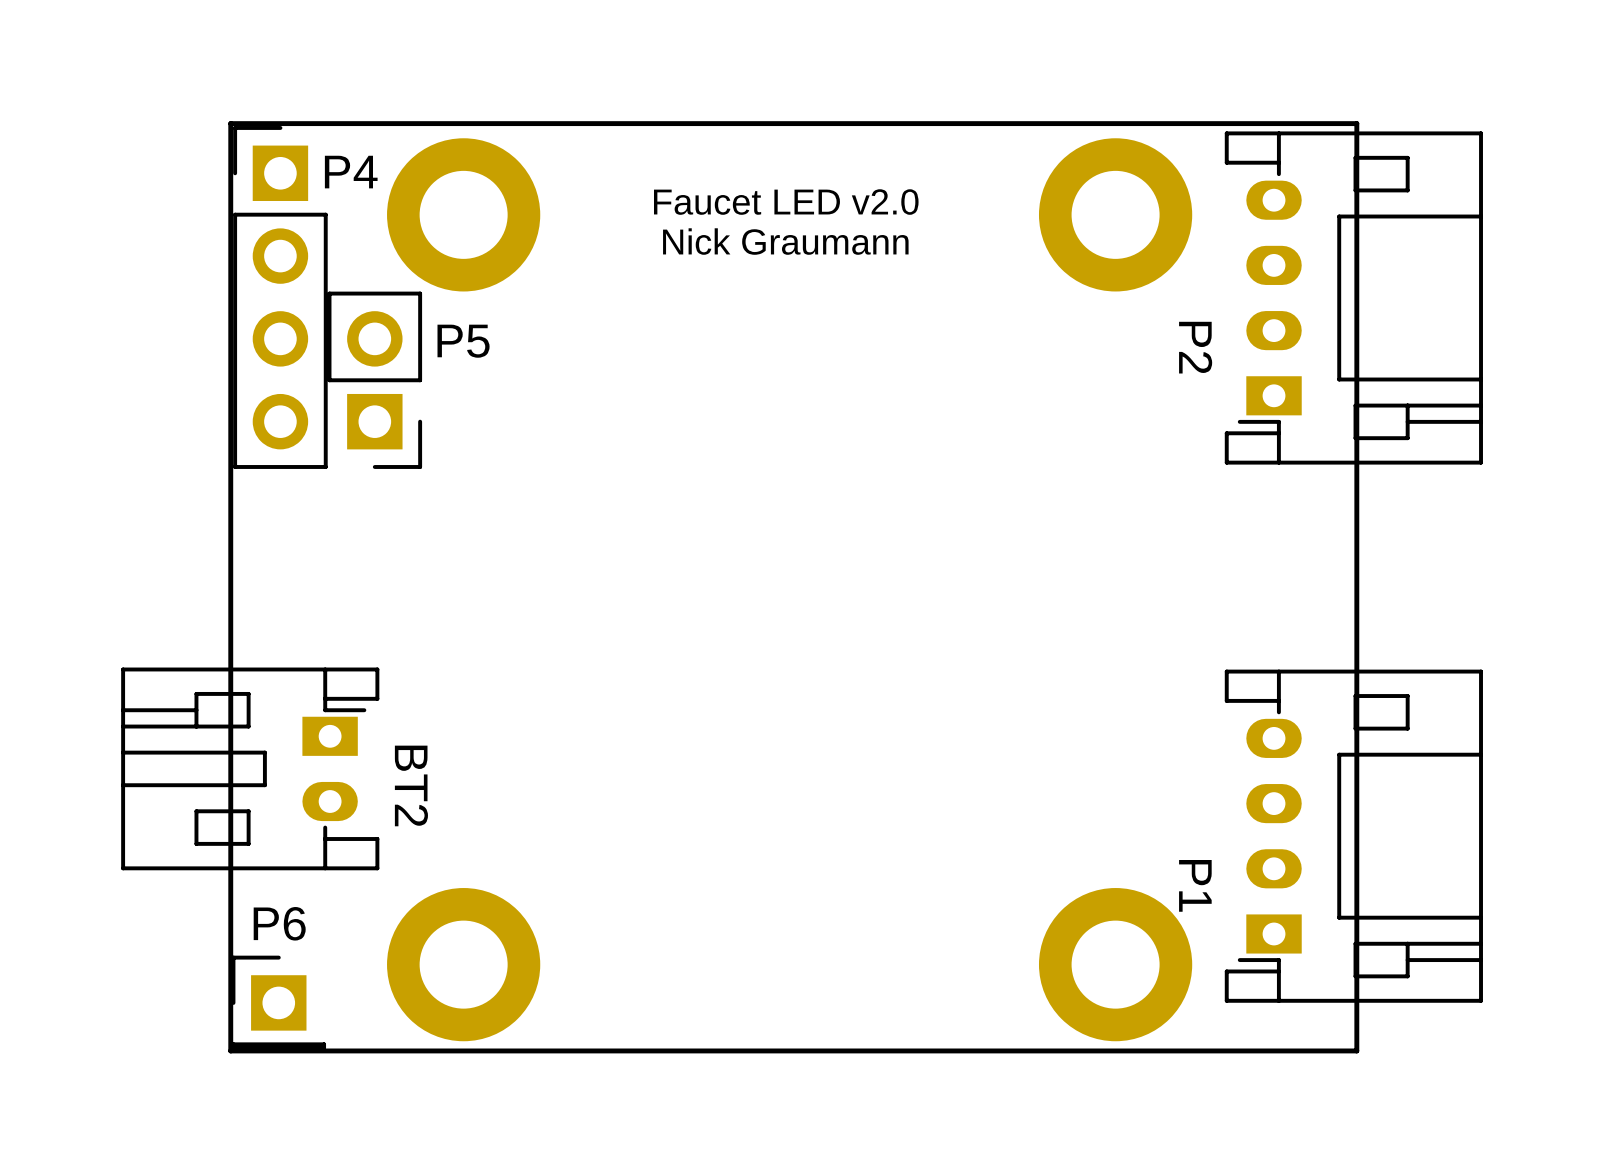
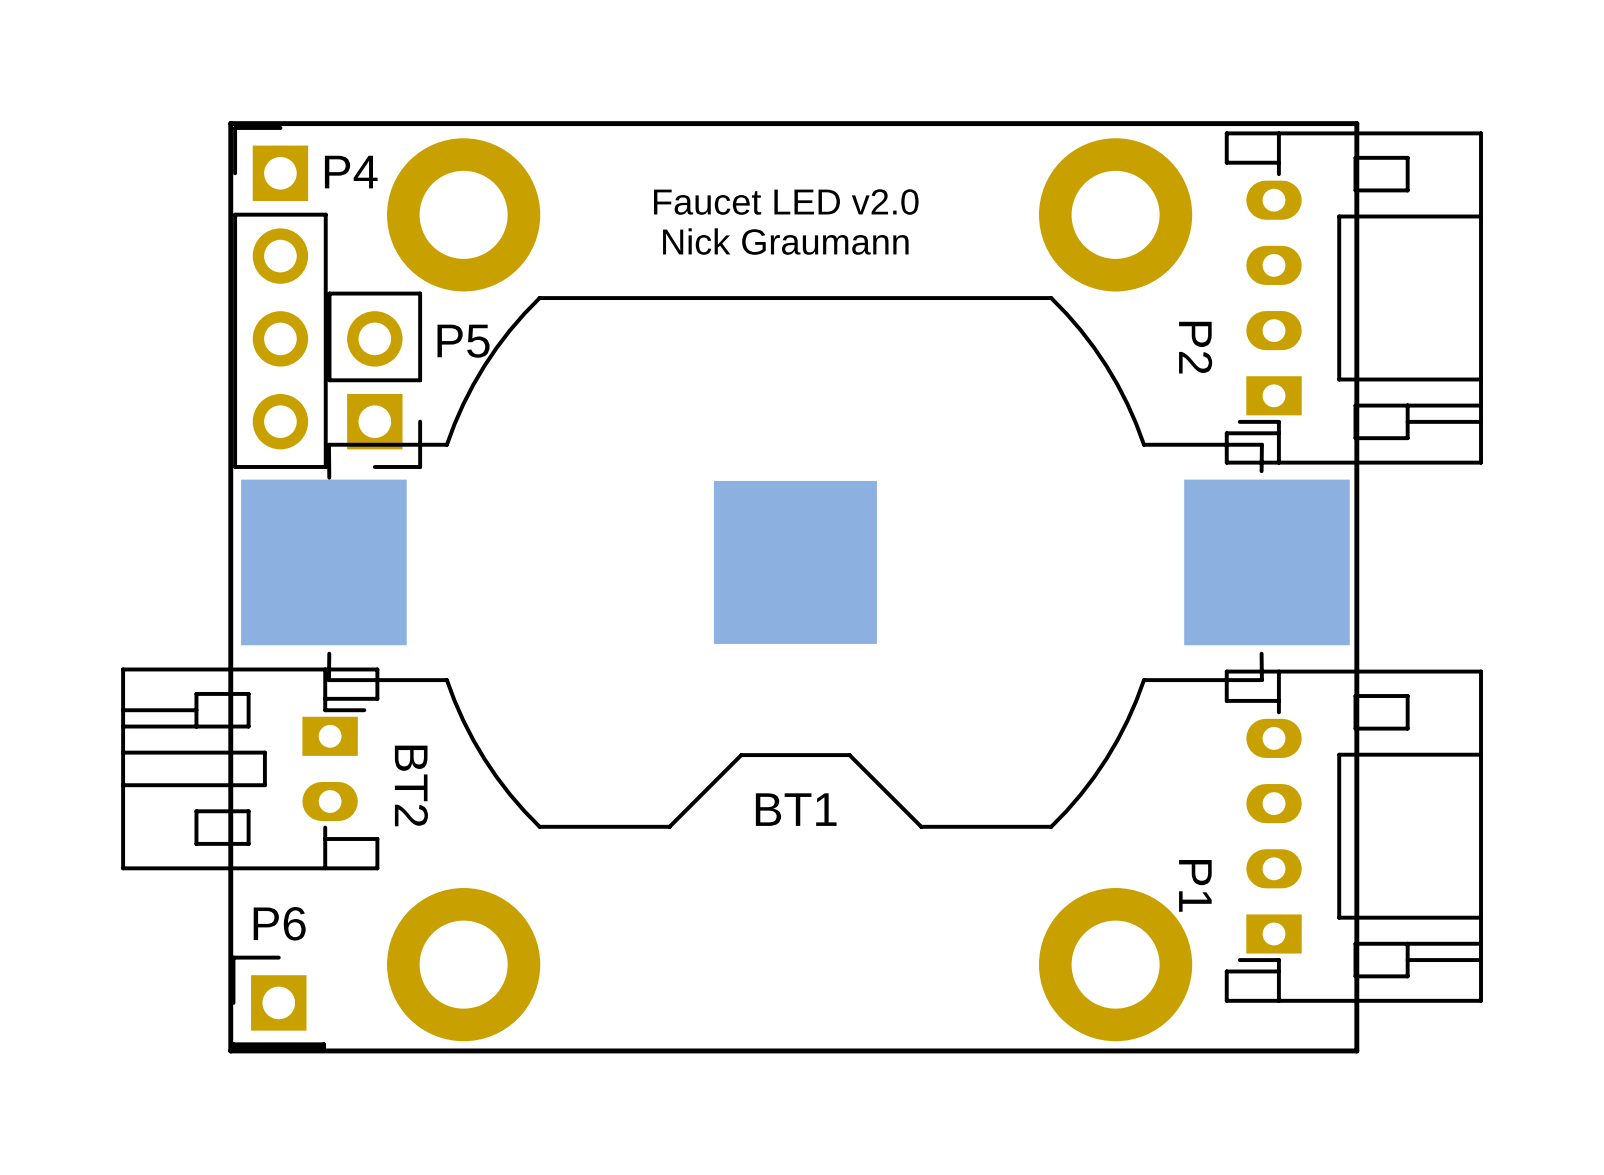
BT1: none -> (795, 562)

